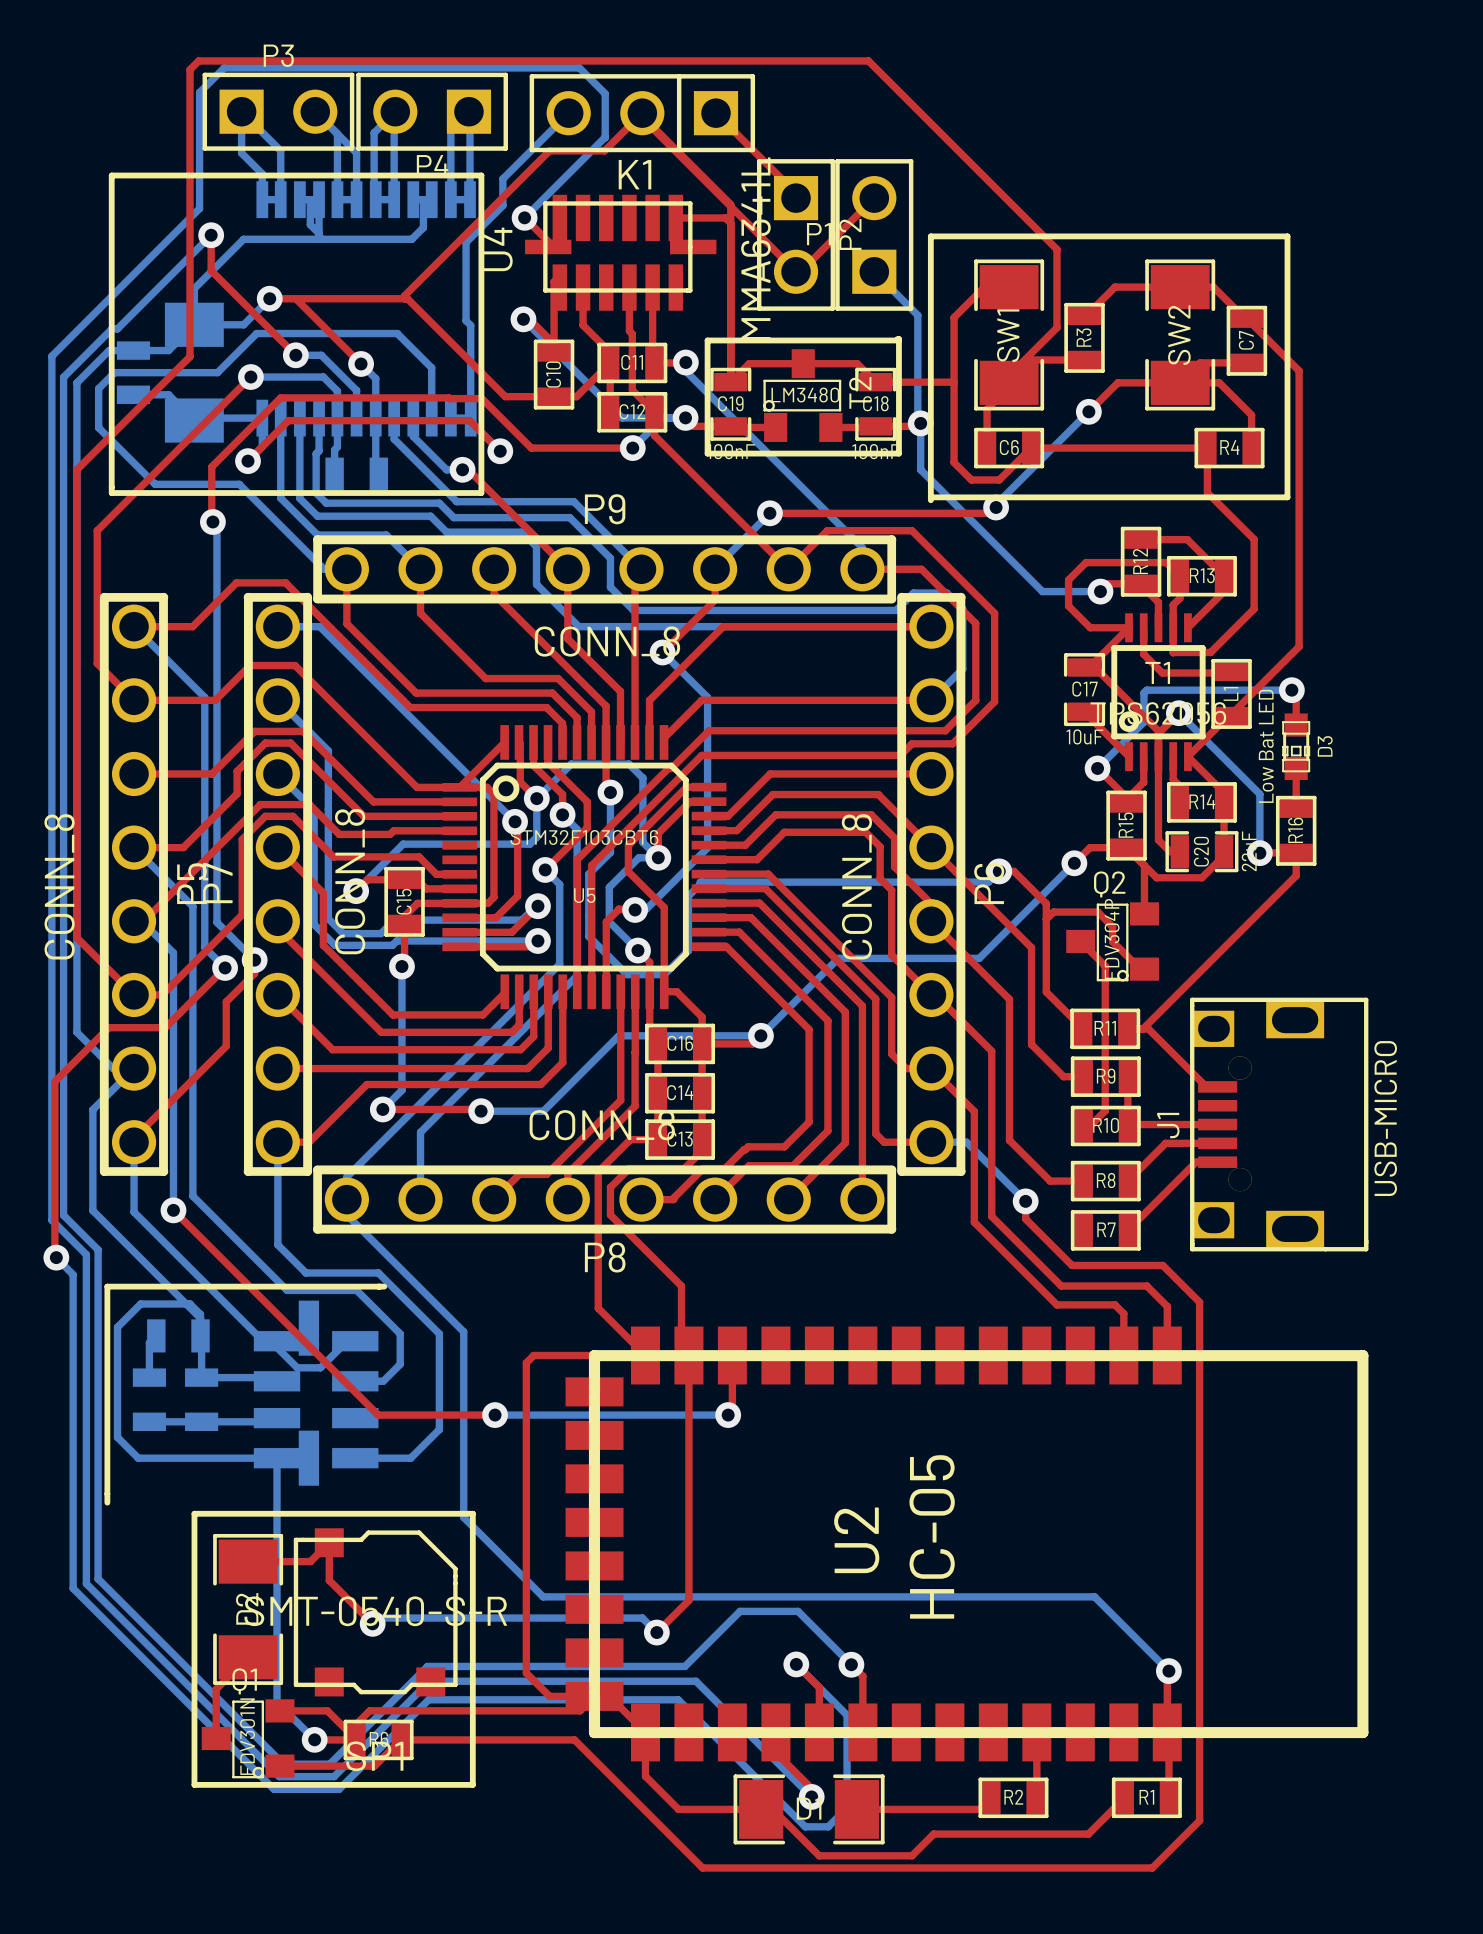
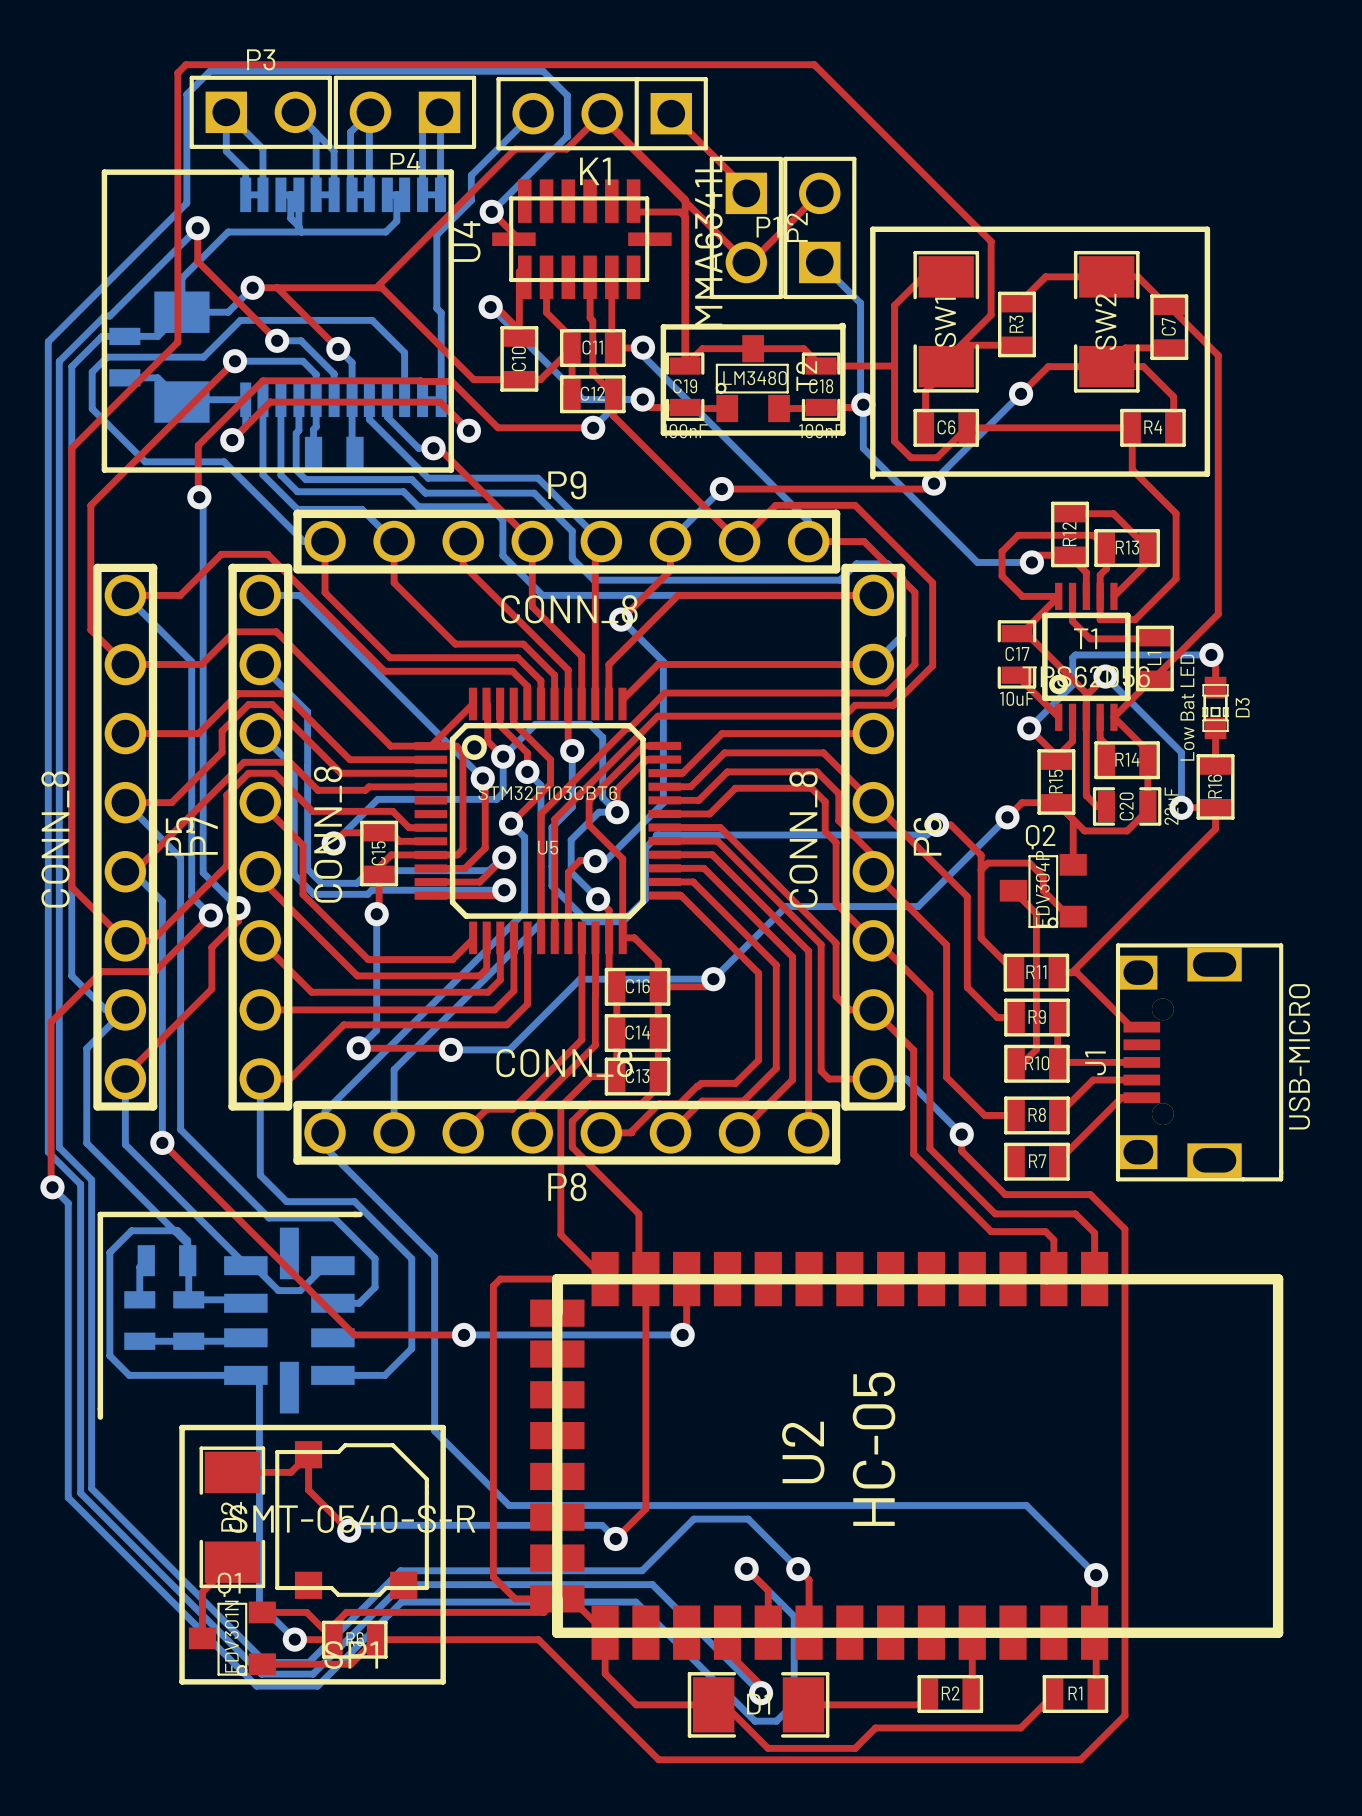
U4 footprint: [525, 194, 717, 311] -> [492, 179, 672, 300]
part footprint: [253, 1300, 379, 1486] -> [224, 1227, 355, 1414]

